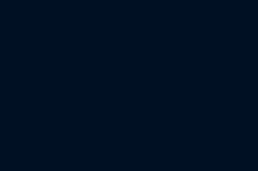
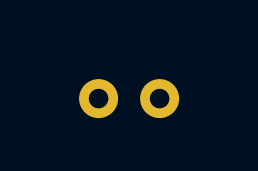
part: none -> (129, 98)

